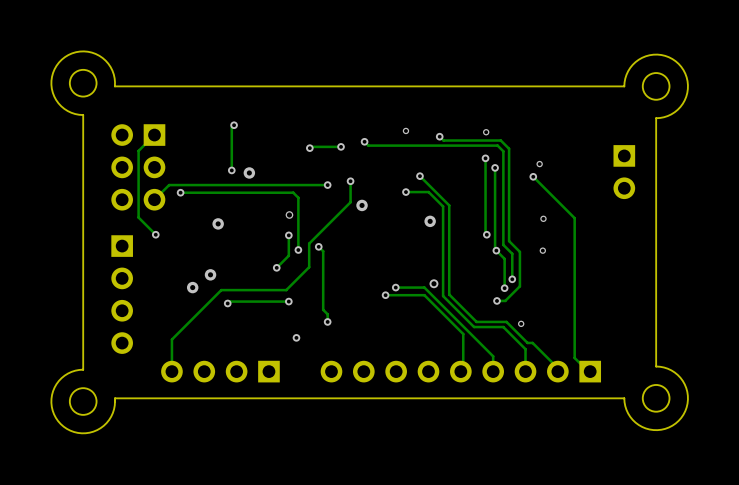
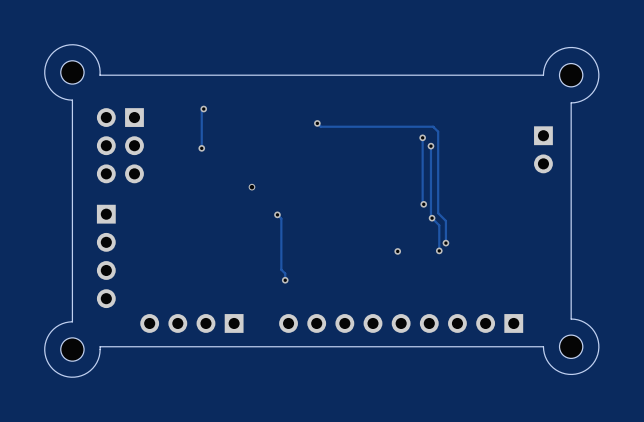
via: (405, 130) -> none
via: (486, 132) -> none
track: (154, 135) (138, 150) (138, 217) (155, 234) -> none
track: (439, 136) (443, 140) (500, 140) (509, 148) (509, 241) (519, 251) (519, 286) (505, 300) (497, 300) -> none
via: (439, 136) -> none
track: (341, 146) (309, 148) -> none
via: (341, 146) -> none
via: (309, 148) -> none
via: (539, 164) -> none
via: (249, 172) -> none
track: (419, 176) (449, 205) (449, 294) (476, 321) (506, 321) (527, 342) (532, 342) (557, 368) (557, 373) -> none
via: (419, 176) -> none
track: (533, 176) (574, 218) (574, 357) (590, 373) -> none
via: (533, 176) -> none
track: (350, 181) (350, 202) (309, 243) (309, 267) (286, 290) (221, 290) (171, 339) (171, 373) -> none
via: (350, 181) -> none
track: (327, 185) (169, 185) (154, 199) -> none
via: (327, 185) -> none
track: (180, 192) (293, 192) (298, 197) (298, 250) -> none
via: (180, 192) -> none
track: (405, 192) (428, 192) (443, 206) (443, 296) (474, 327) (503, 327) (525, 349) (525, 373) -> none
via: (405, 192) -> none
via: (362, 205) -> none
via: (543, 218) -> none
via: (430, 221) -> none
via: (218, 223) -> none
via: (155, 234) -> none
track: (288, 235) (288, 255) (276, 267) -> none
via: (288, 235) -> none
via: (298, 250) -> none
via: (542, 250) -> none
via: (276, 267) -> none
via: (210, 274) -> none
via: (433, 283) -> none
via: (192, 287) -> none
track: (395, 287) (424, 287) (493, 356) (493, 373) -> none
via: (395, 287) -> none
via: none -> (397, 251)
track: (385, 295) (424, 295) (463, 334) (463, 371) (460, 373) -> none
via: (385, 295) -> none
via: (497, 300) -> none
track: (288, 301) (229, 301) (227, 303) -> none
via: (288, 301) -> none
via: (227, 303) -> none
via: (521, 323) -> none
via: (296, 337) -> none

